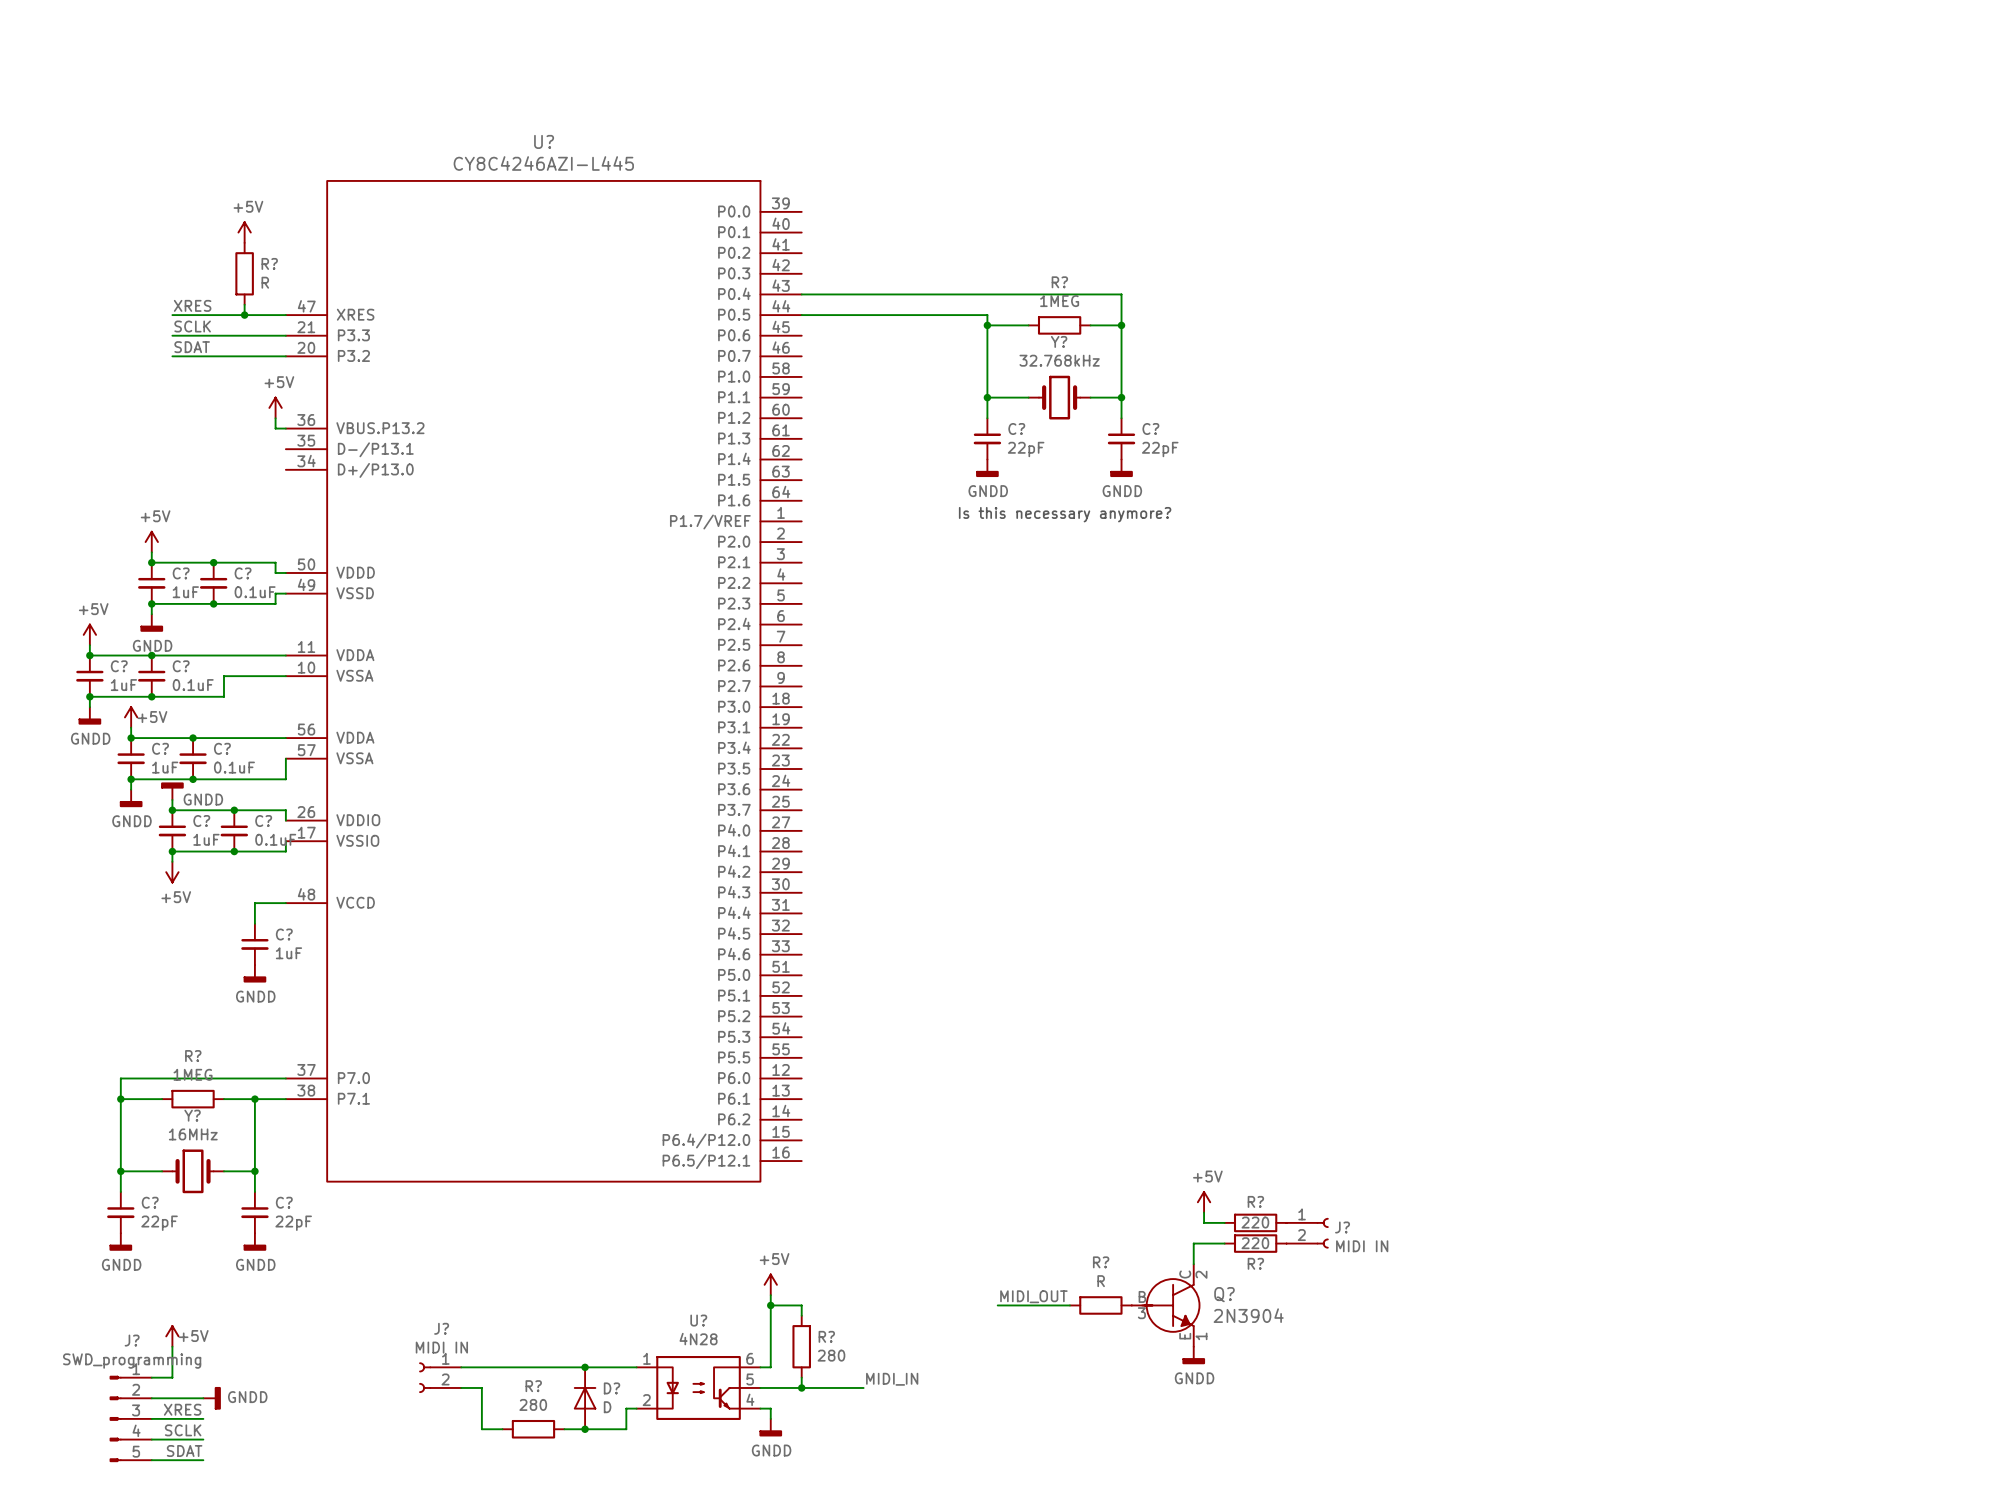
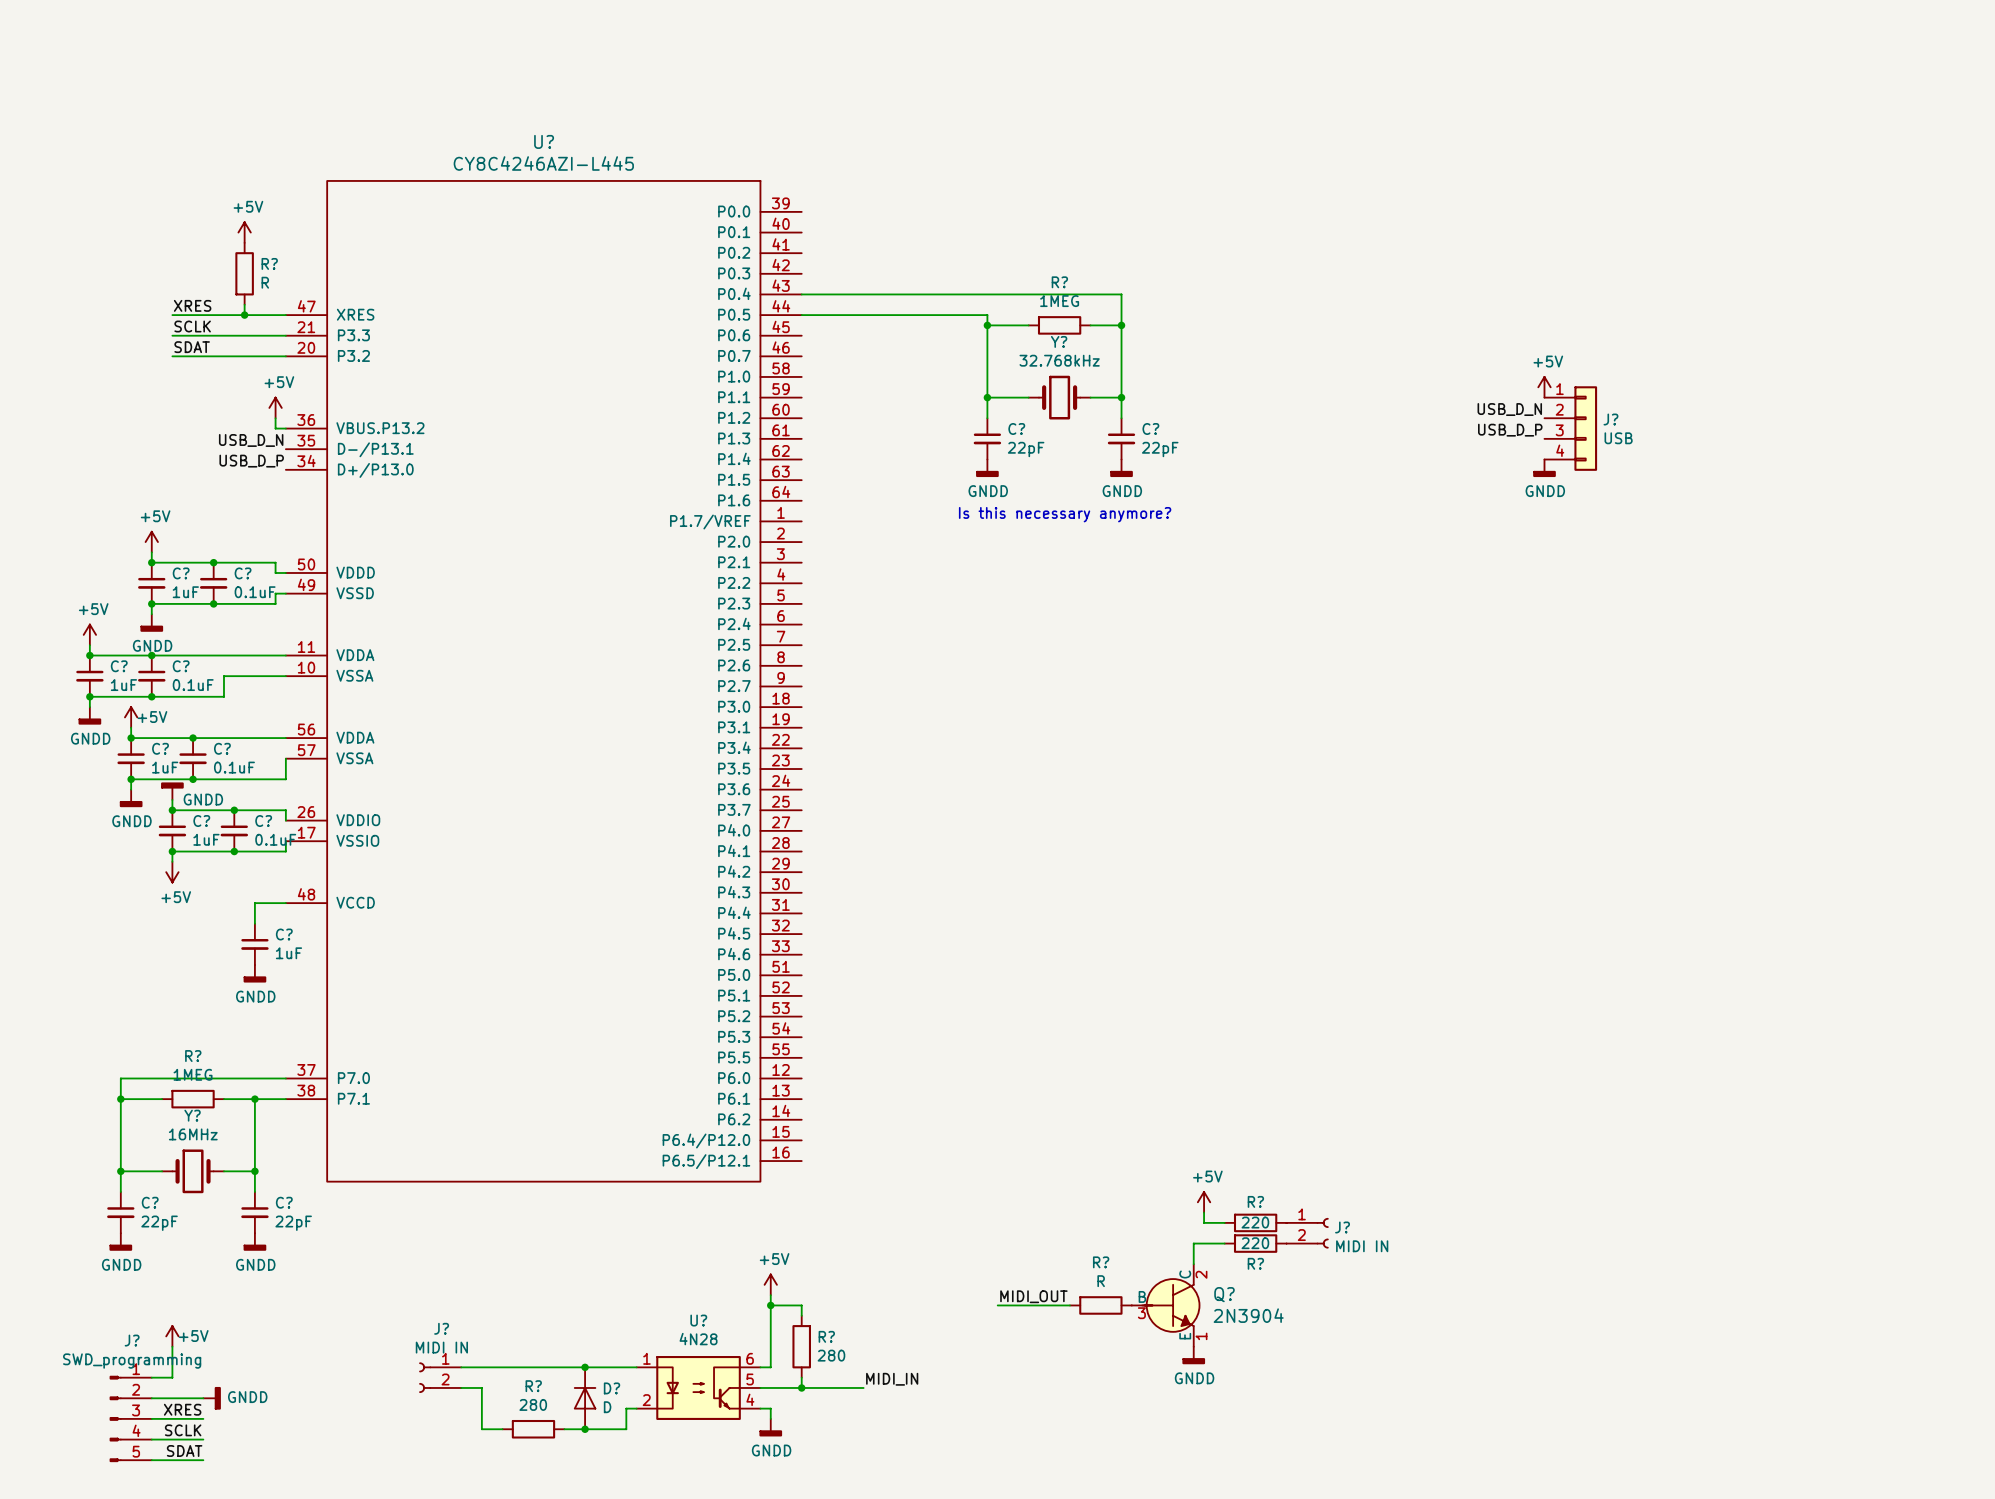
power symbol: none -> +5V (1544, 387)
label: none -> USB_D_N (1509, 409)
J?: none -> USB (1570, 428)
label: none -> USB_D_P (1510, 430)
label: none -> USB_D_N (251, 440)
label: none -> USB_D_P (251, 461)
power symbol: none -> GNDD (1544, 468)

